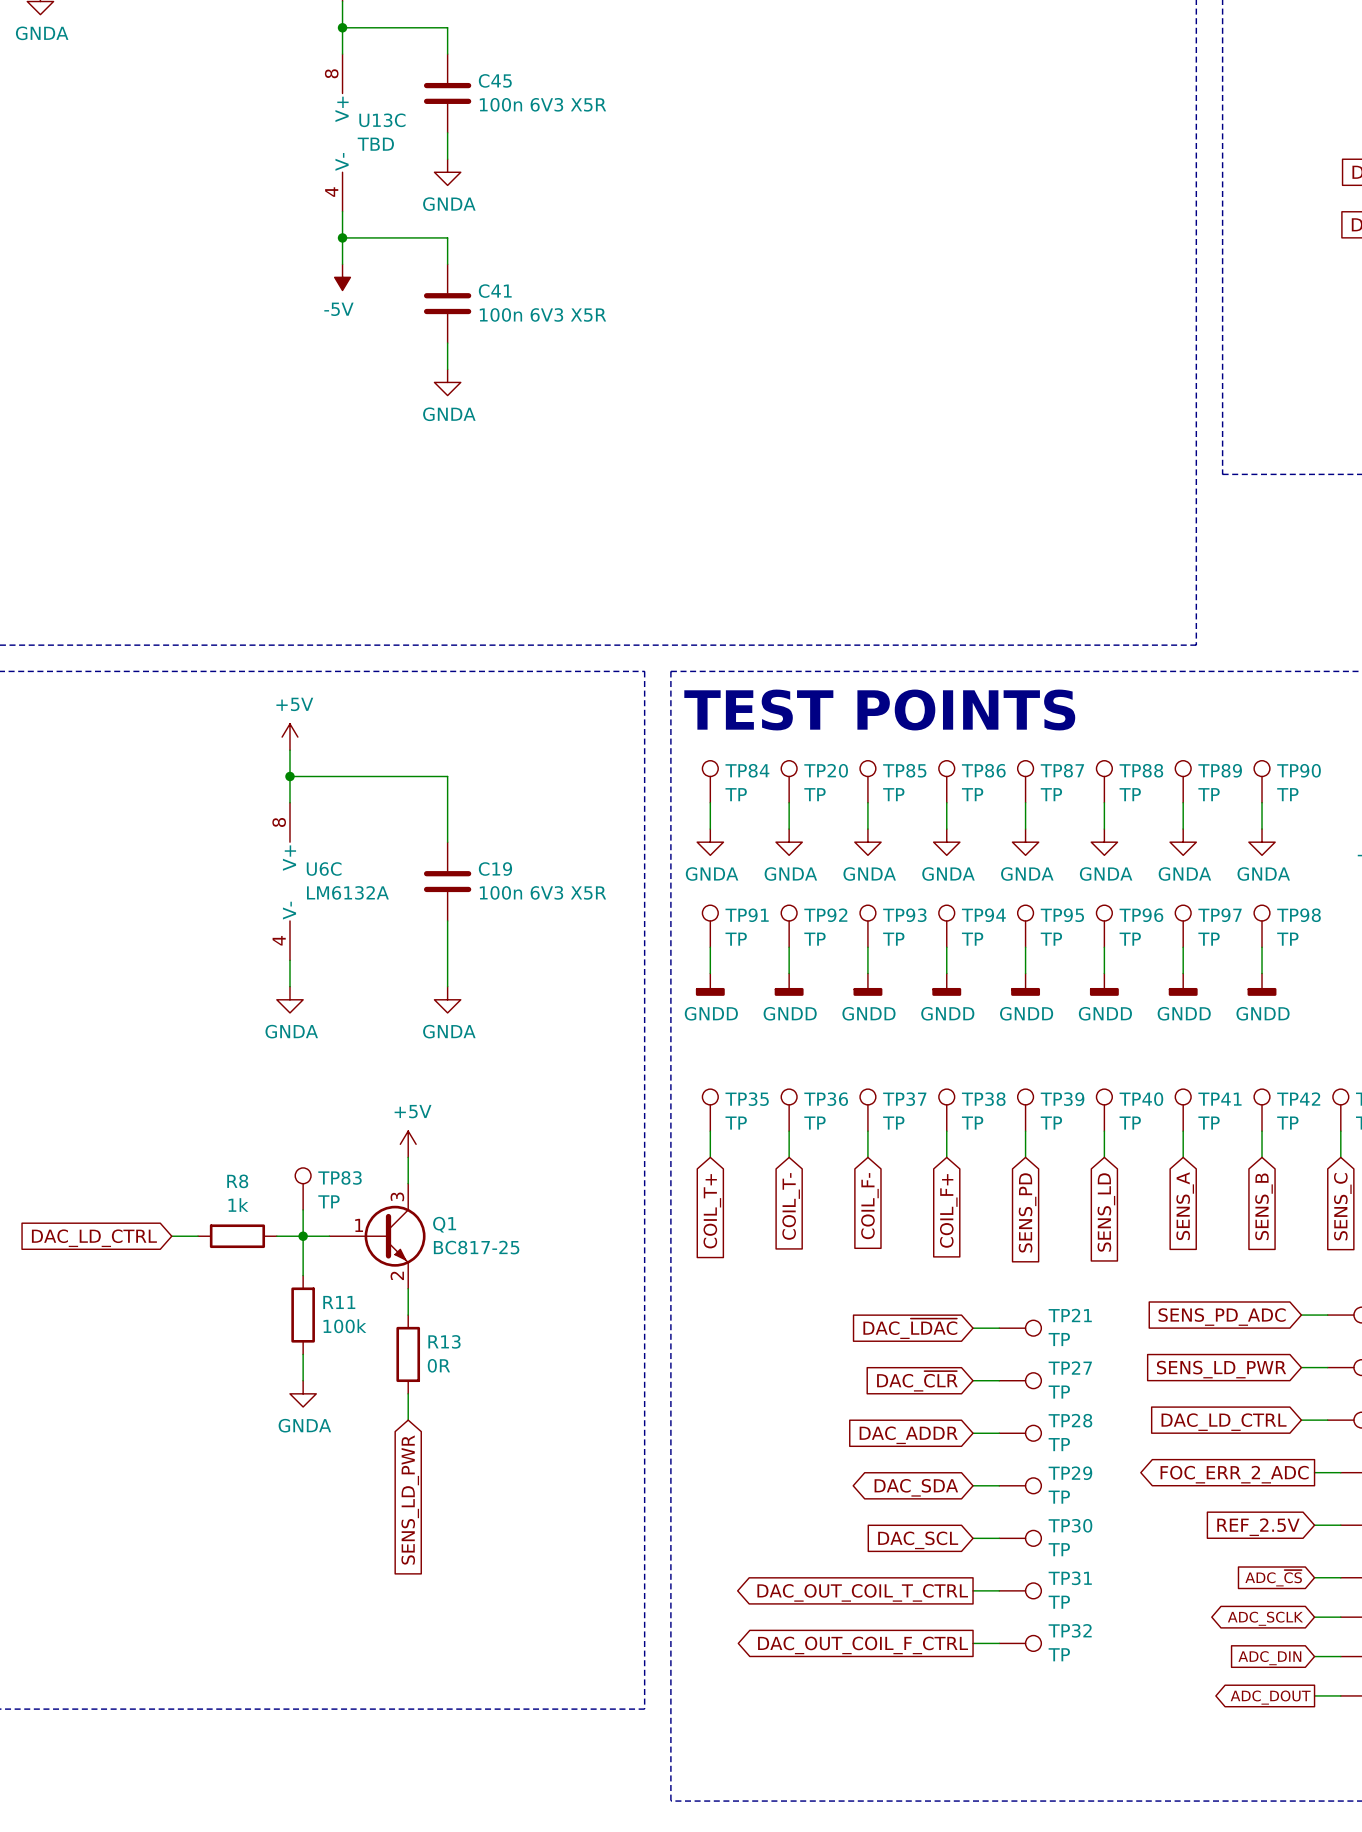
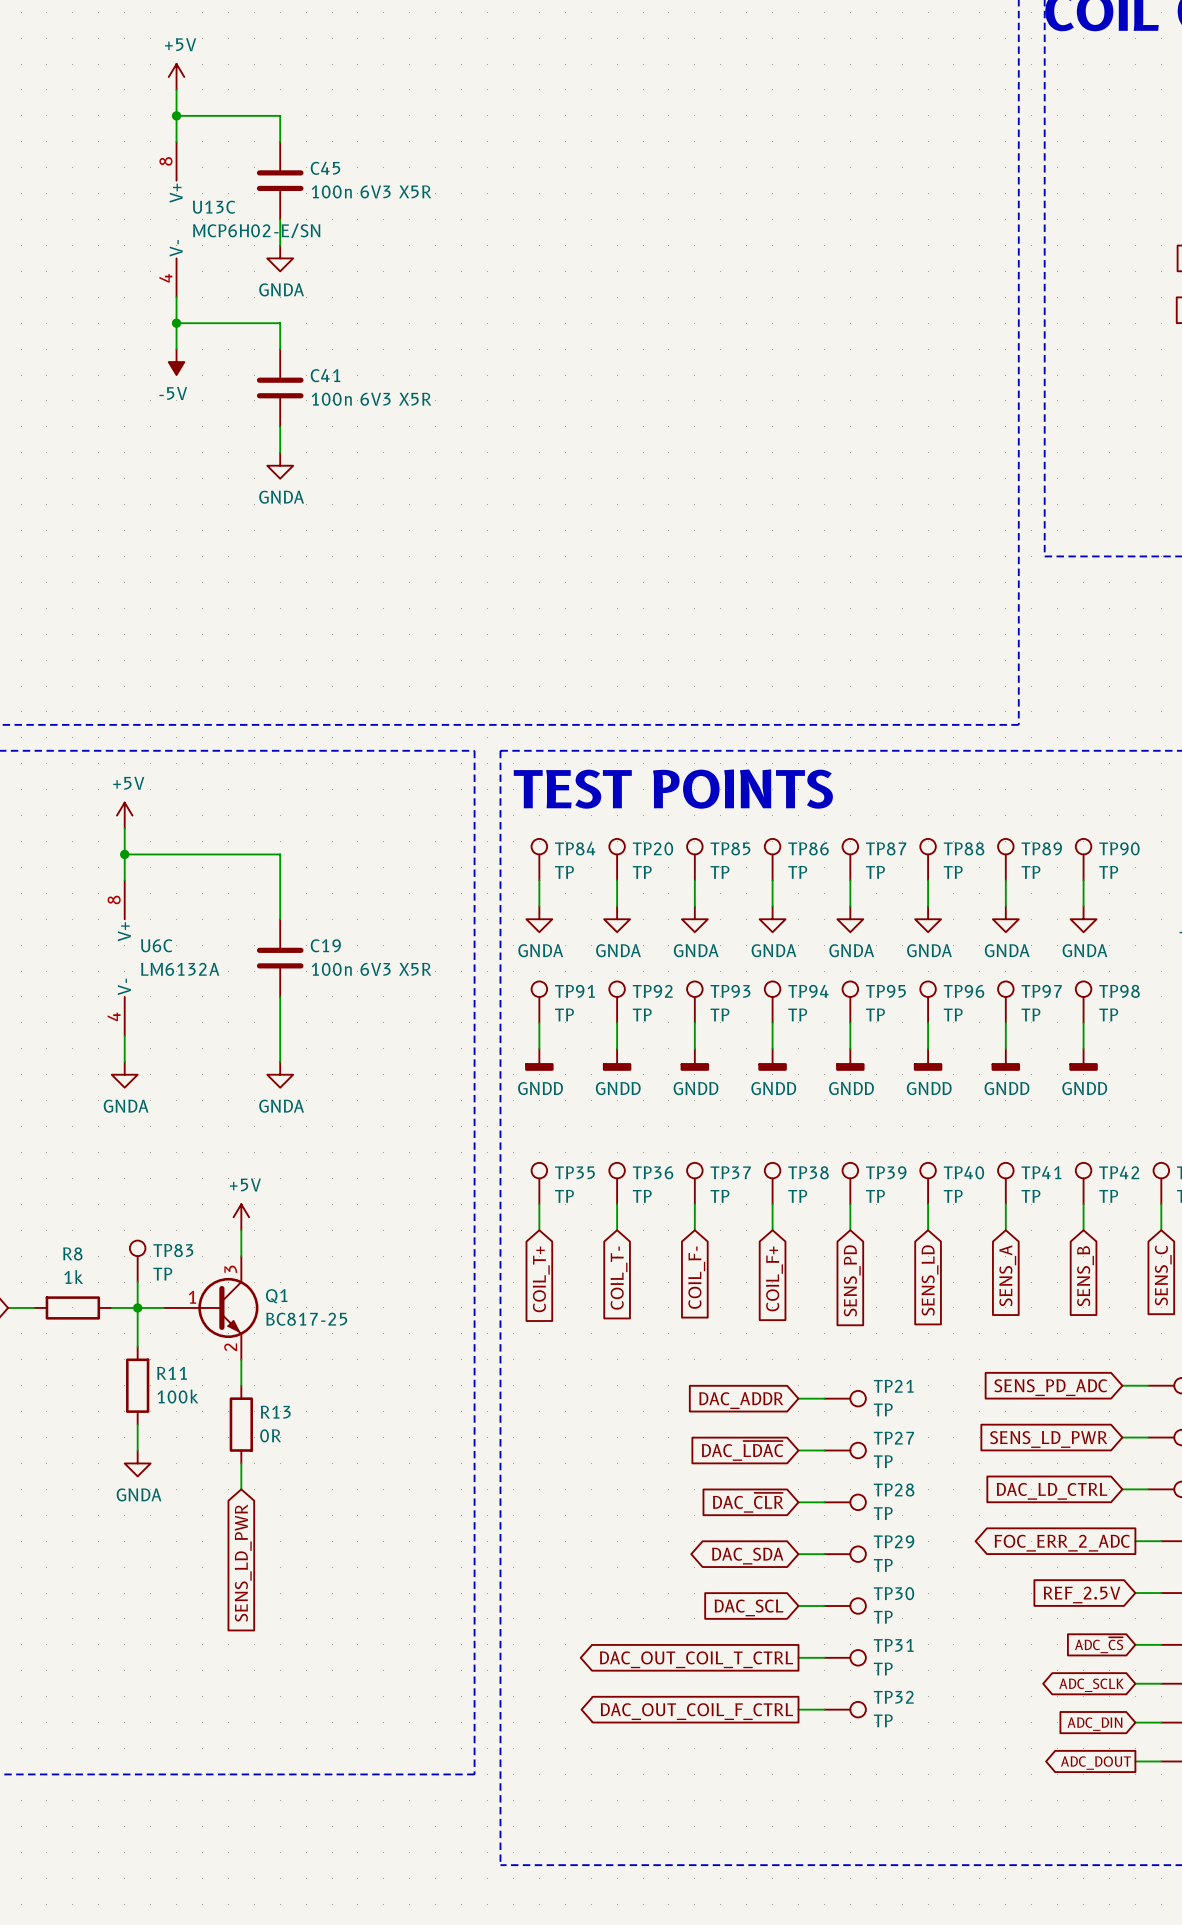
U13C value: TBD (375, 144) -> MCP6H02-E/SN (256, 230)
global label: DAC_~{LDAC} (910, 1328) -> DAC_ADDR (741, 1400)
global label: DAC_~{CLR} (917, 1381) -> DAC_~{LDAC} (742, 1450)
global label: DAC_ADDR (908, 1435) -> DAC_~{CLR} (748, 1502)

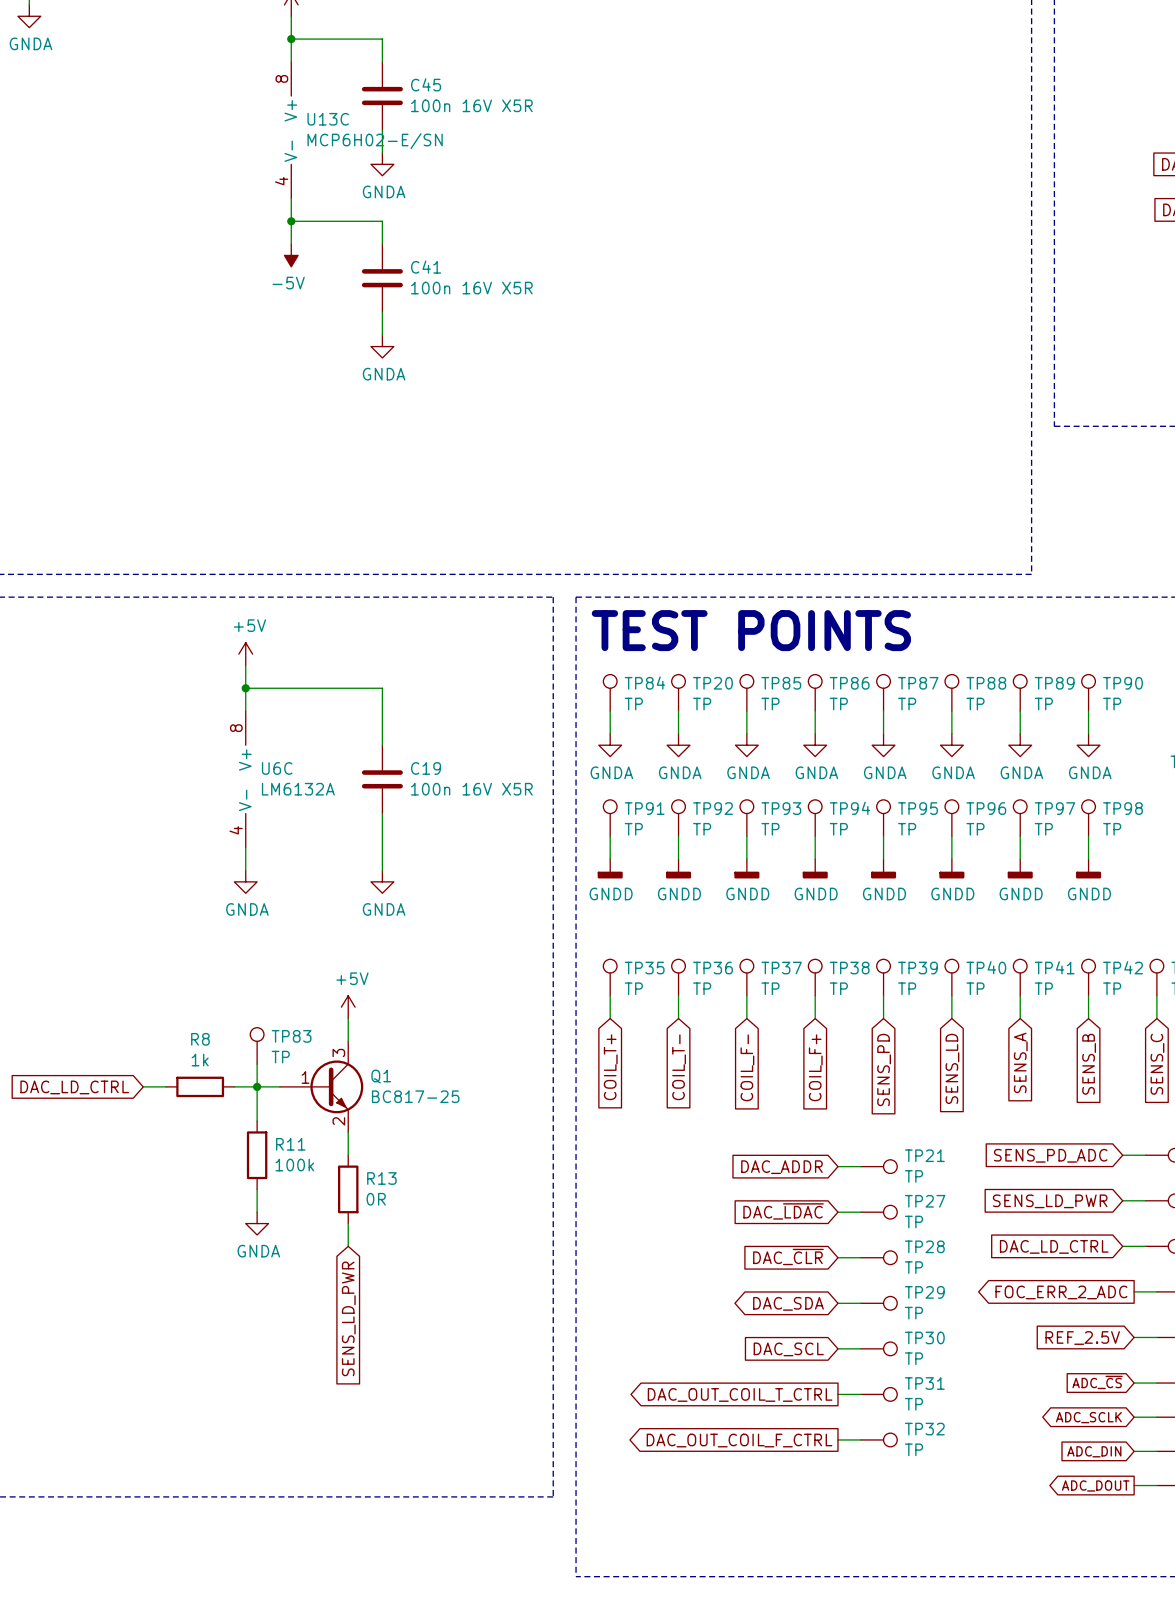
C45 value: 100n 6V3 X5R (371, 191) -> 100n 16V X5R (471, 105)
C41 value: 100n 6V3 X5R (371, 399) -> 100n 16V X5R (471, 288)
C19 value: 100n 6V3 X5R (371, 969) -> 100n 16V X5R (471, 789)

